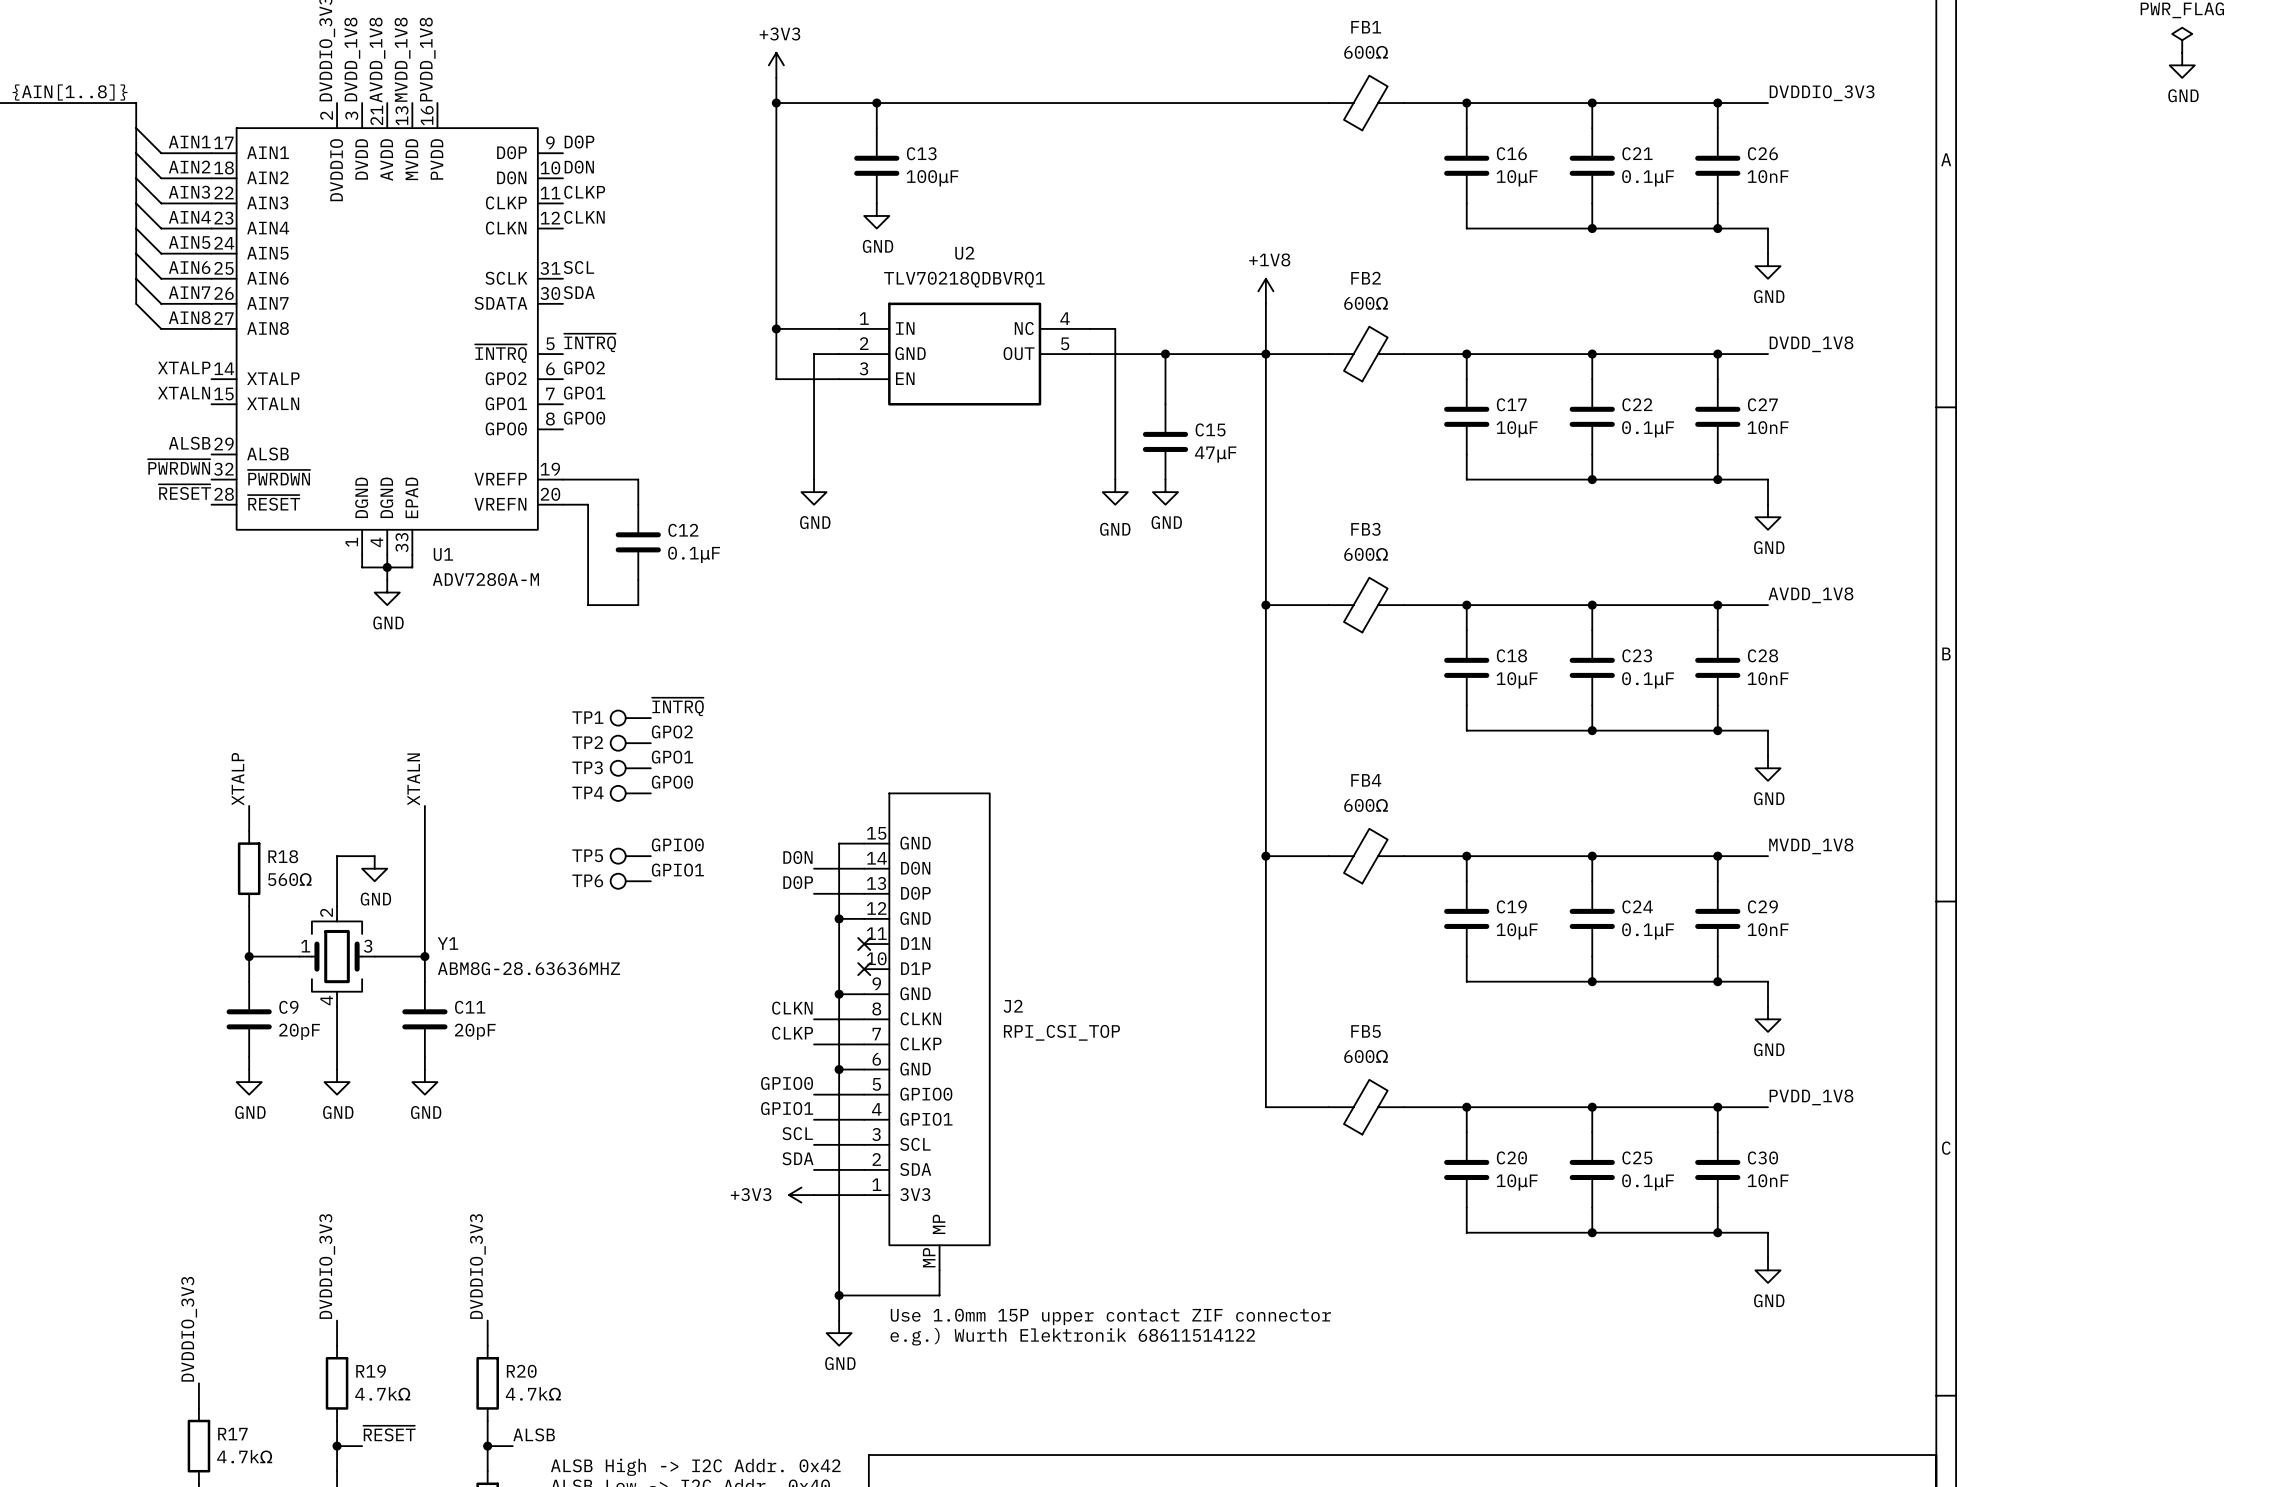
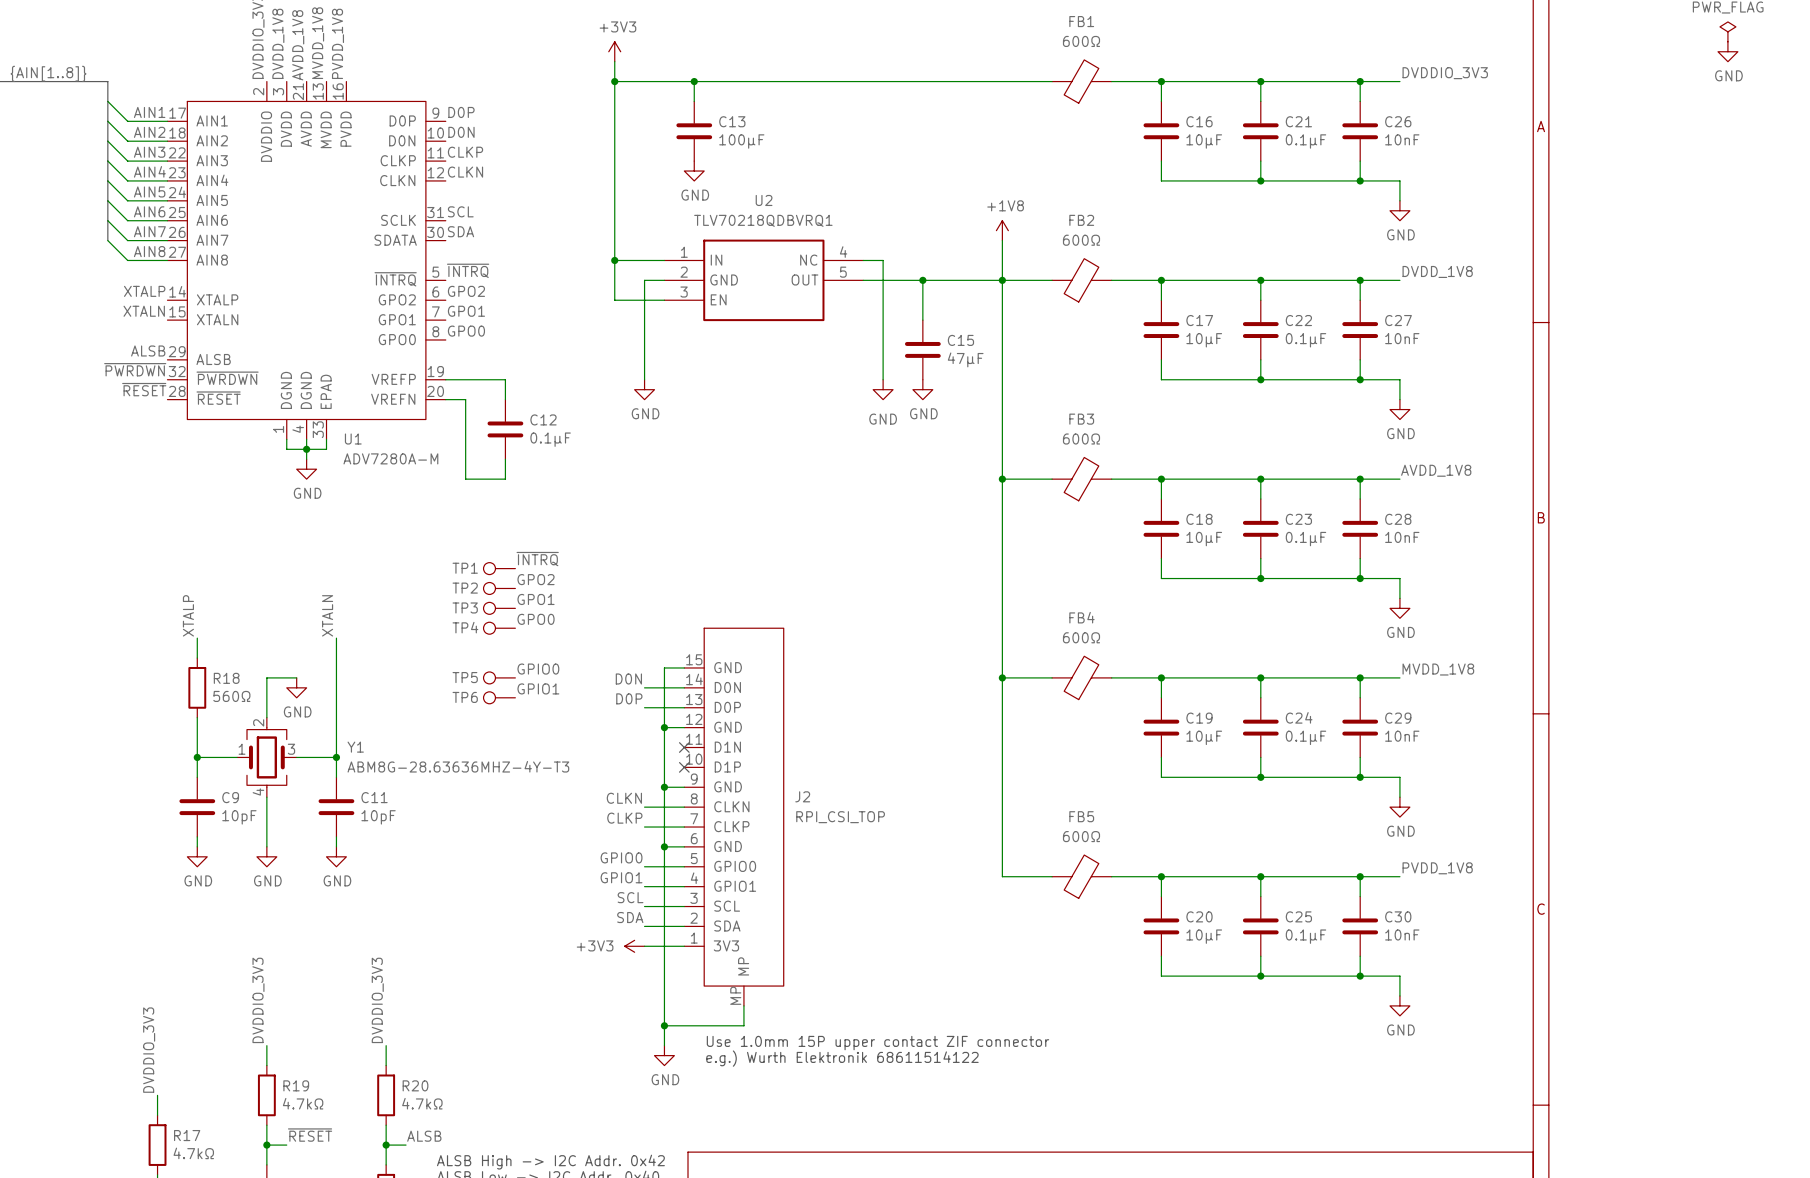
Y1 value: ABM8G-28.63636MHZ (529, 968) -> ABM8G-28.63636MHZ-4Y-T3 (458, 766)
C9 value: 20pF (299, 1031) -> 10pF (239, 817)
C11 value: 20pF (475, 1031) -> 10pF (378, 817)

